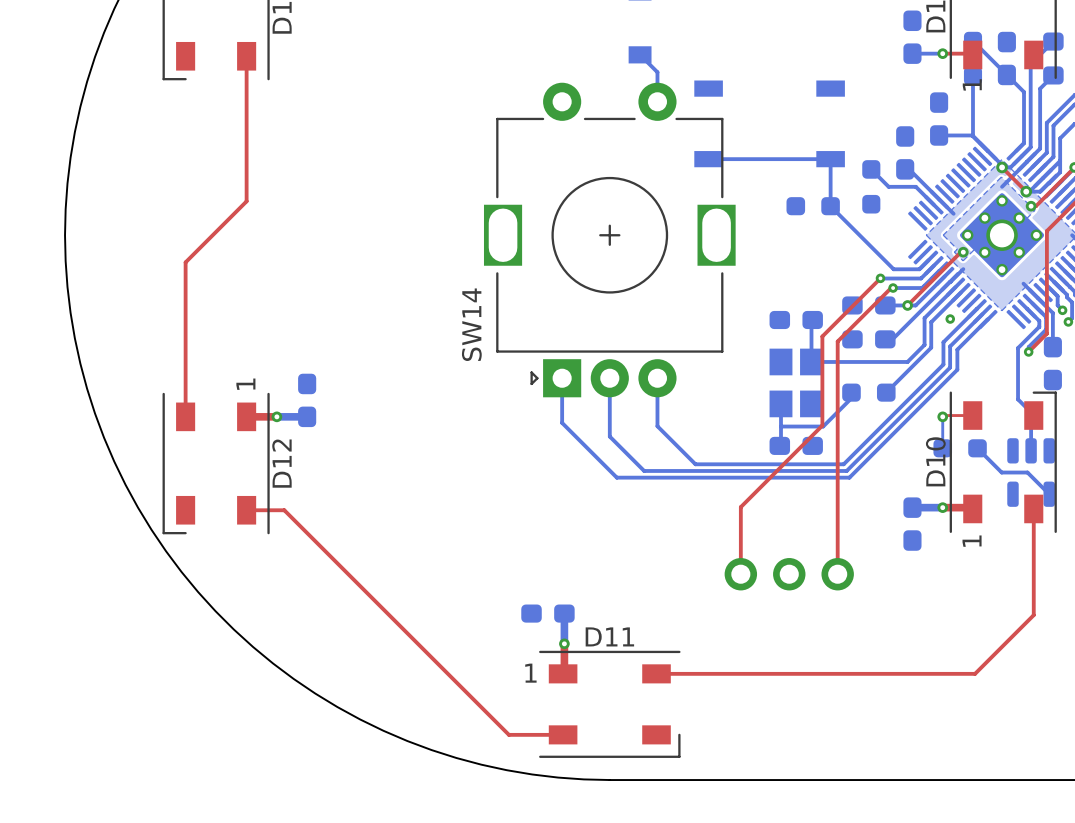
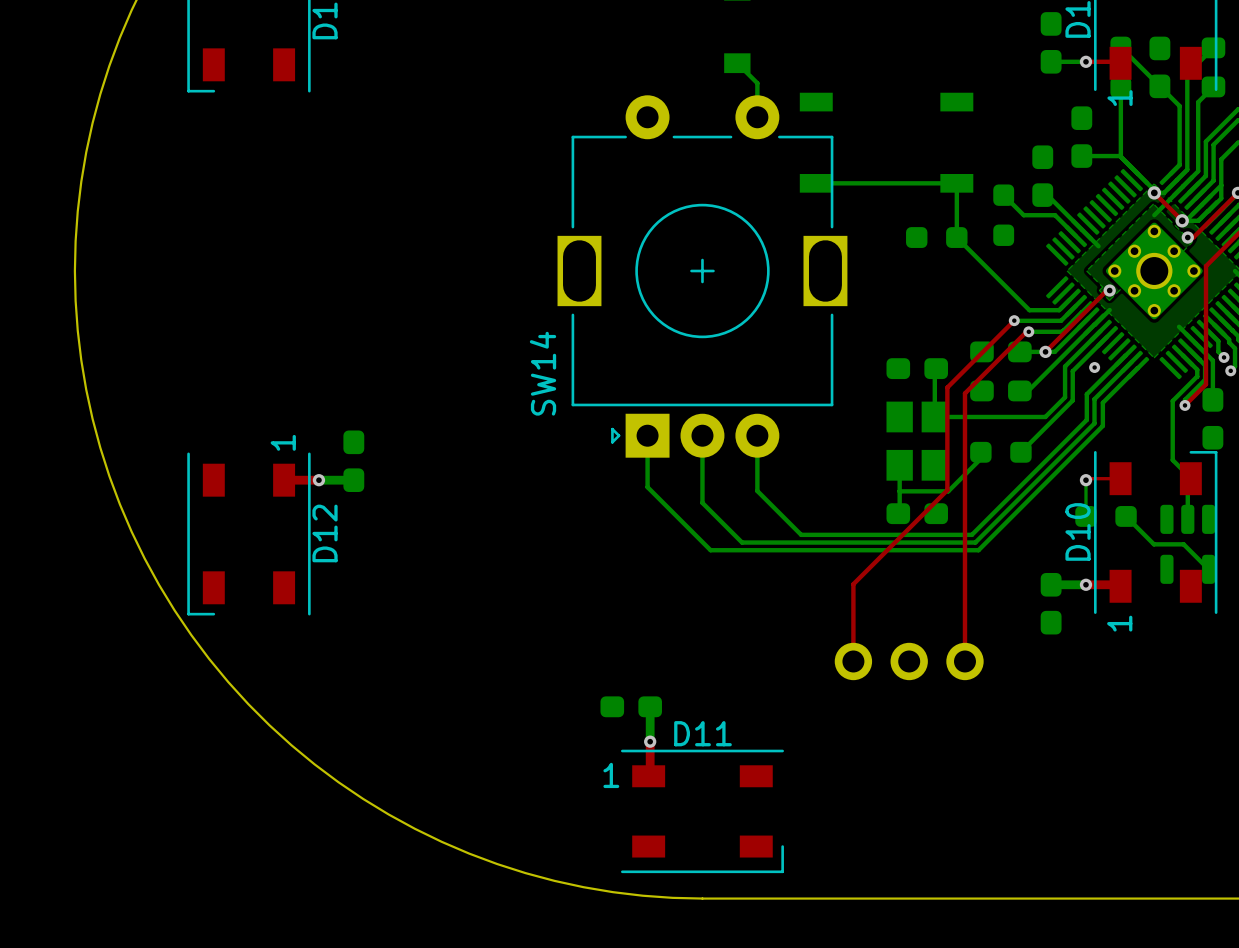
top track: (246, 56) (246, 201) (185, 262) (185, 416) -> none
top track: (1033, 508) (1033, 615) (975, 673) (656, 673) -> none
top track: (246, 510) (284, 510) (508, 734) (563, 734) -> none

